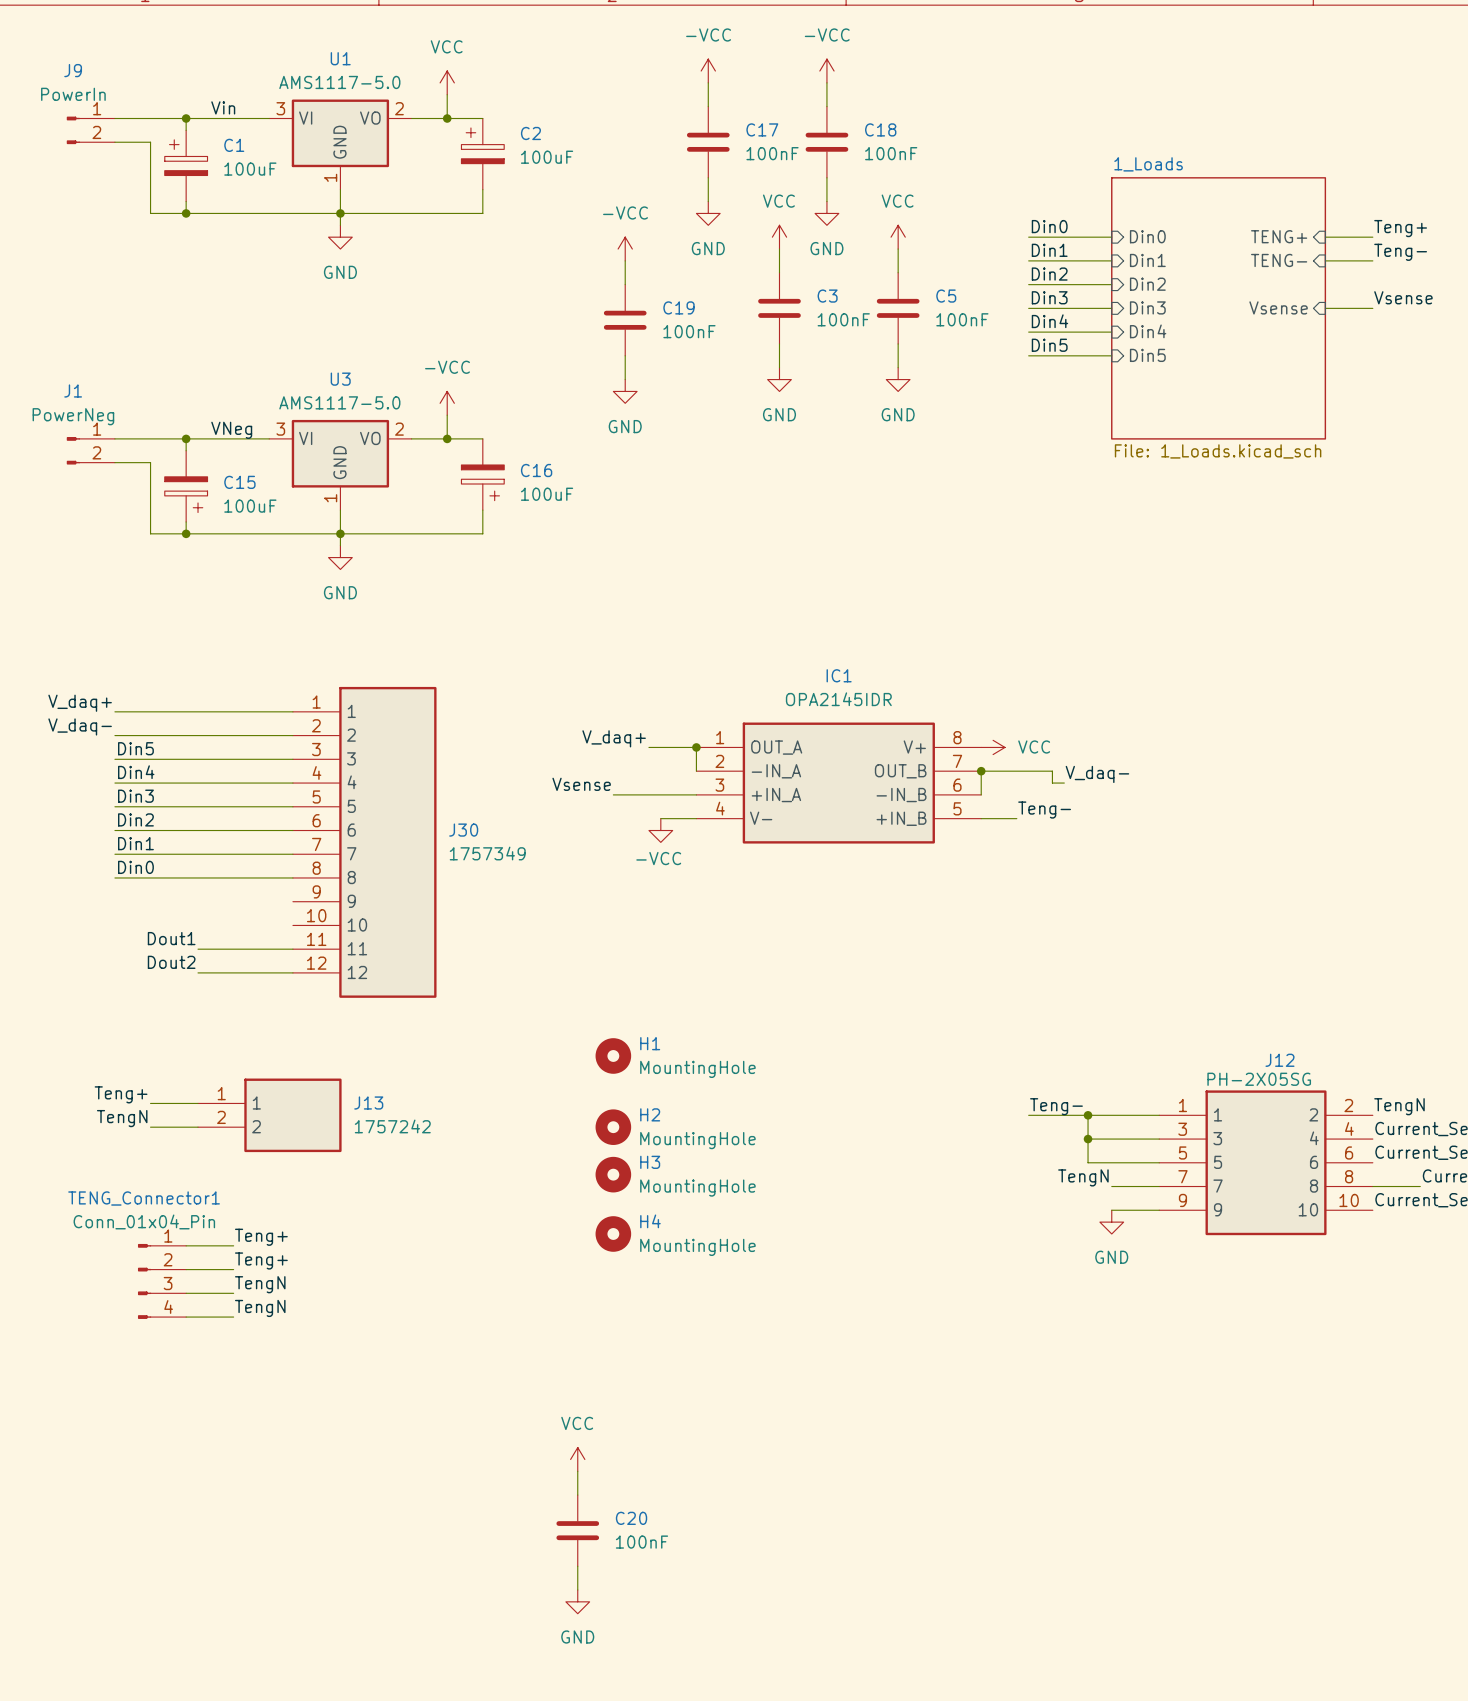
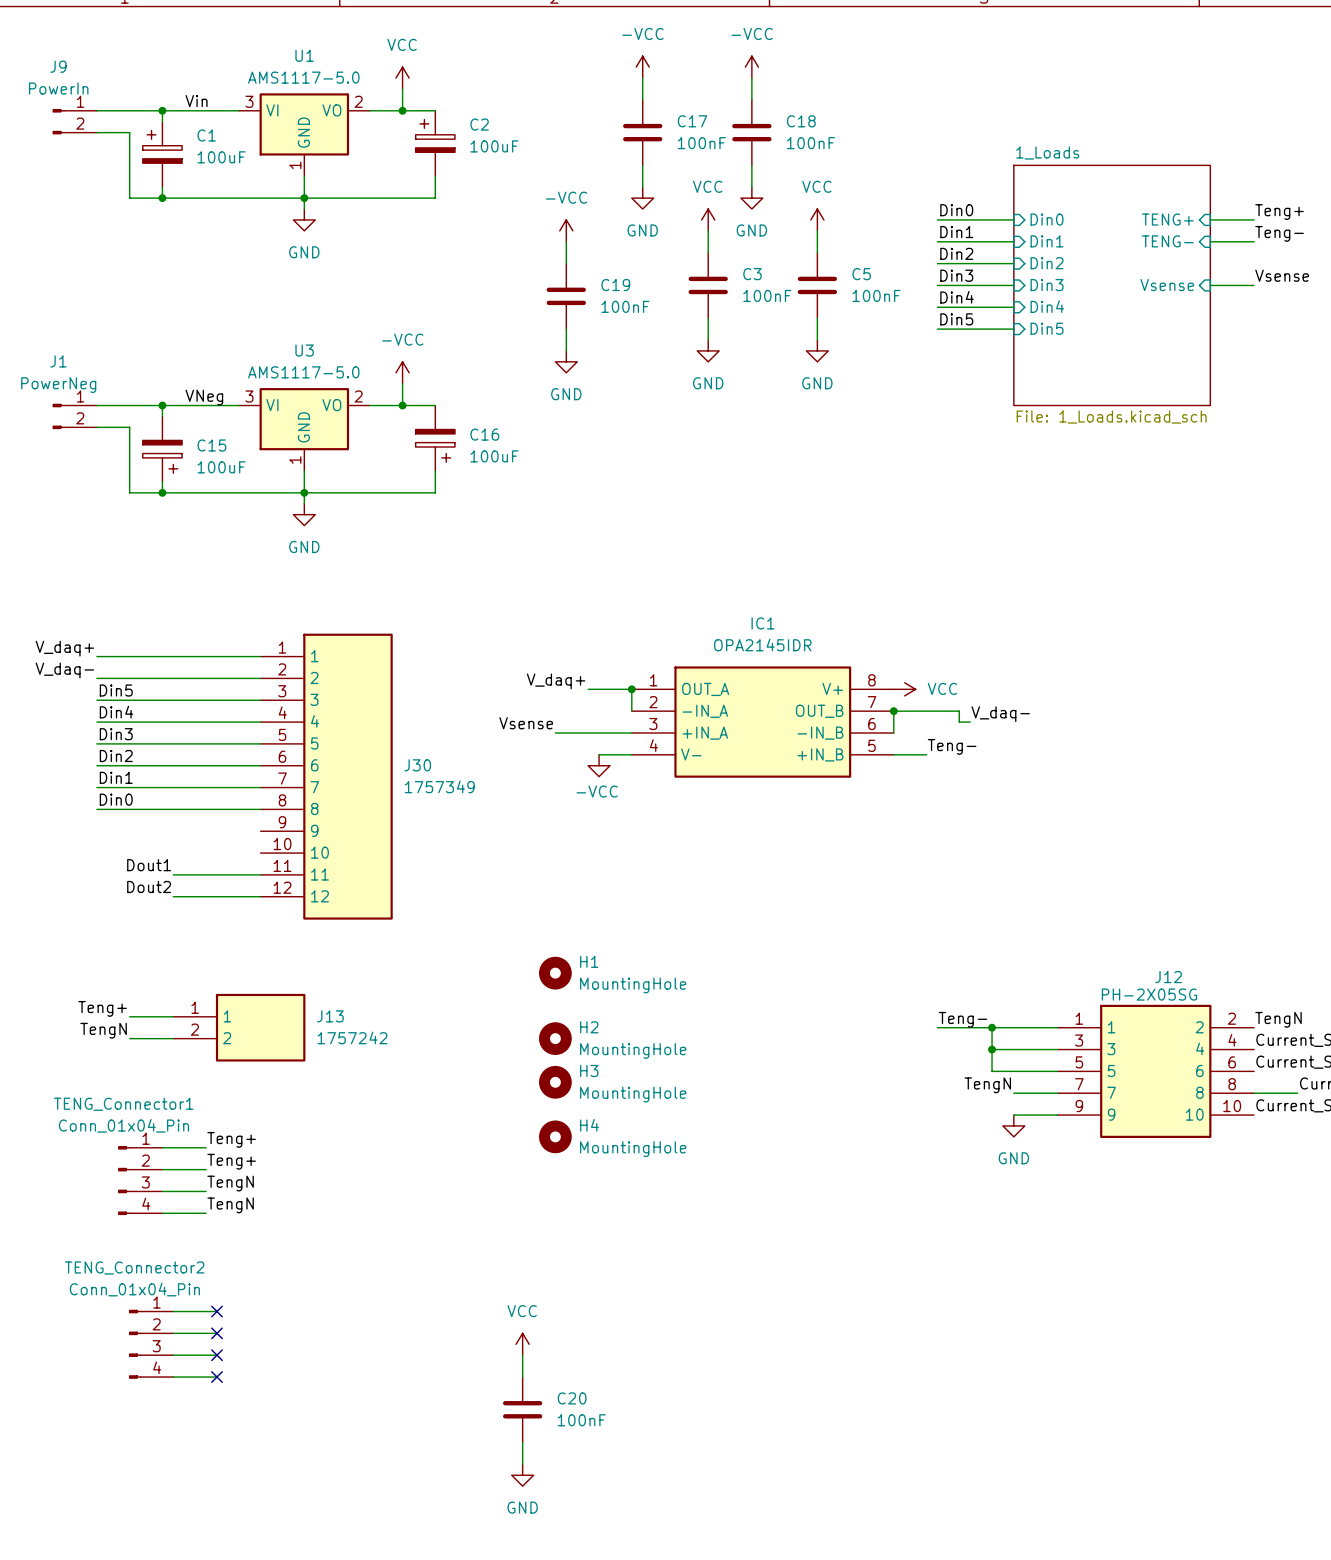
wire: none -> (173, 1311) (217, 1311)
no-connect mark: none -> (217, 1311)
wire: none -> (173, 1333) (217, 1333)
no-connect mark: none -> (217, 1333)
TENG_Connector2: none -> Conn_01x04_Pin (151, 1344)
wire: none -> (173, 1355) (217, 1355)
no-connect mark: none -> (217, 1355)
wire: none -> (173, 1377) (217, 1377)
no-connect mark: none -> (217, 1377)

